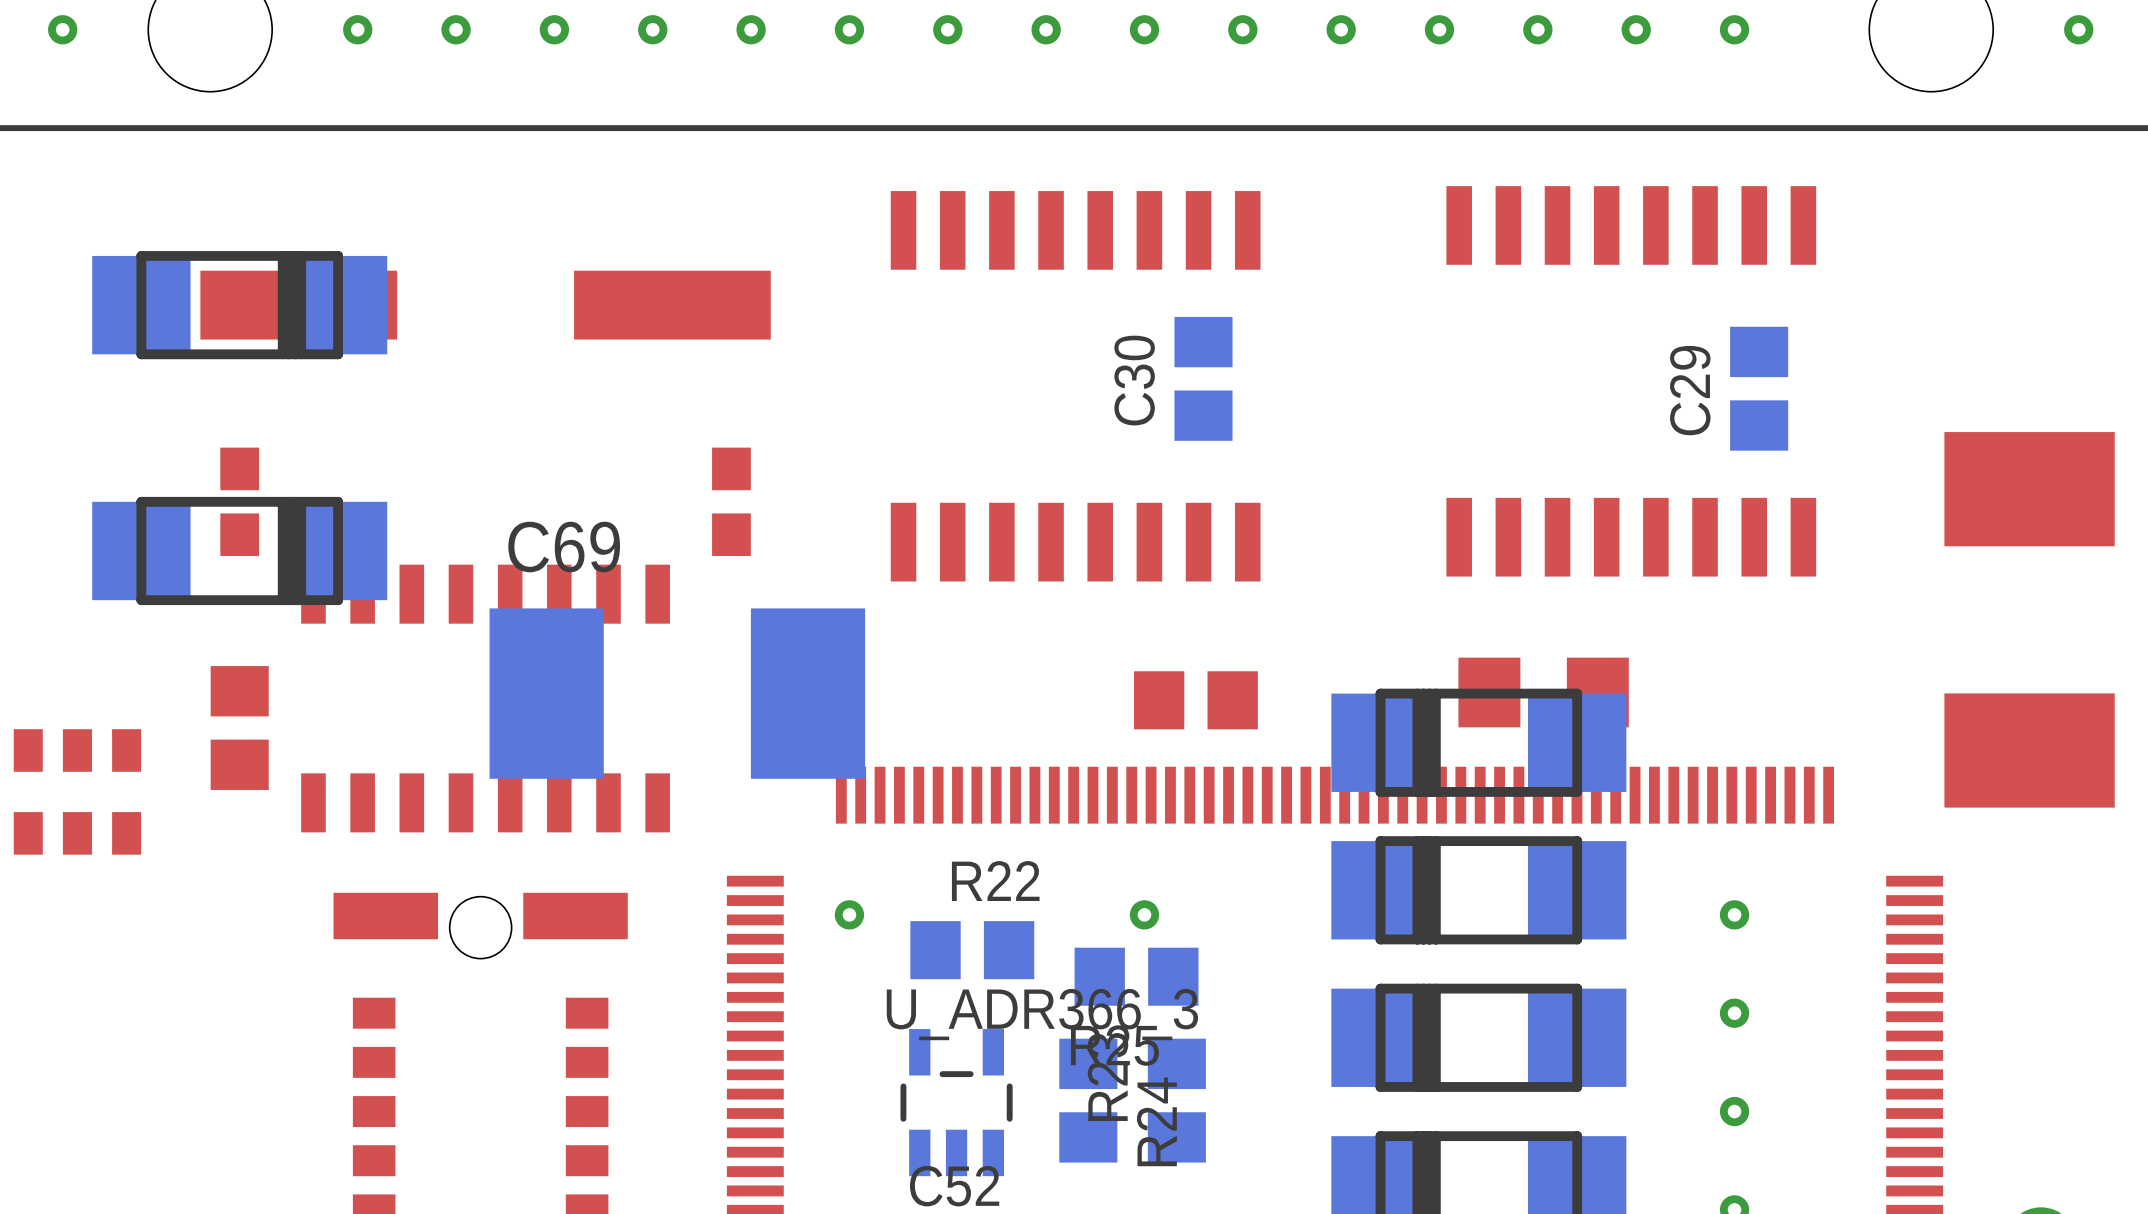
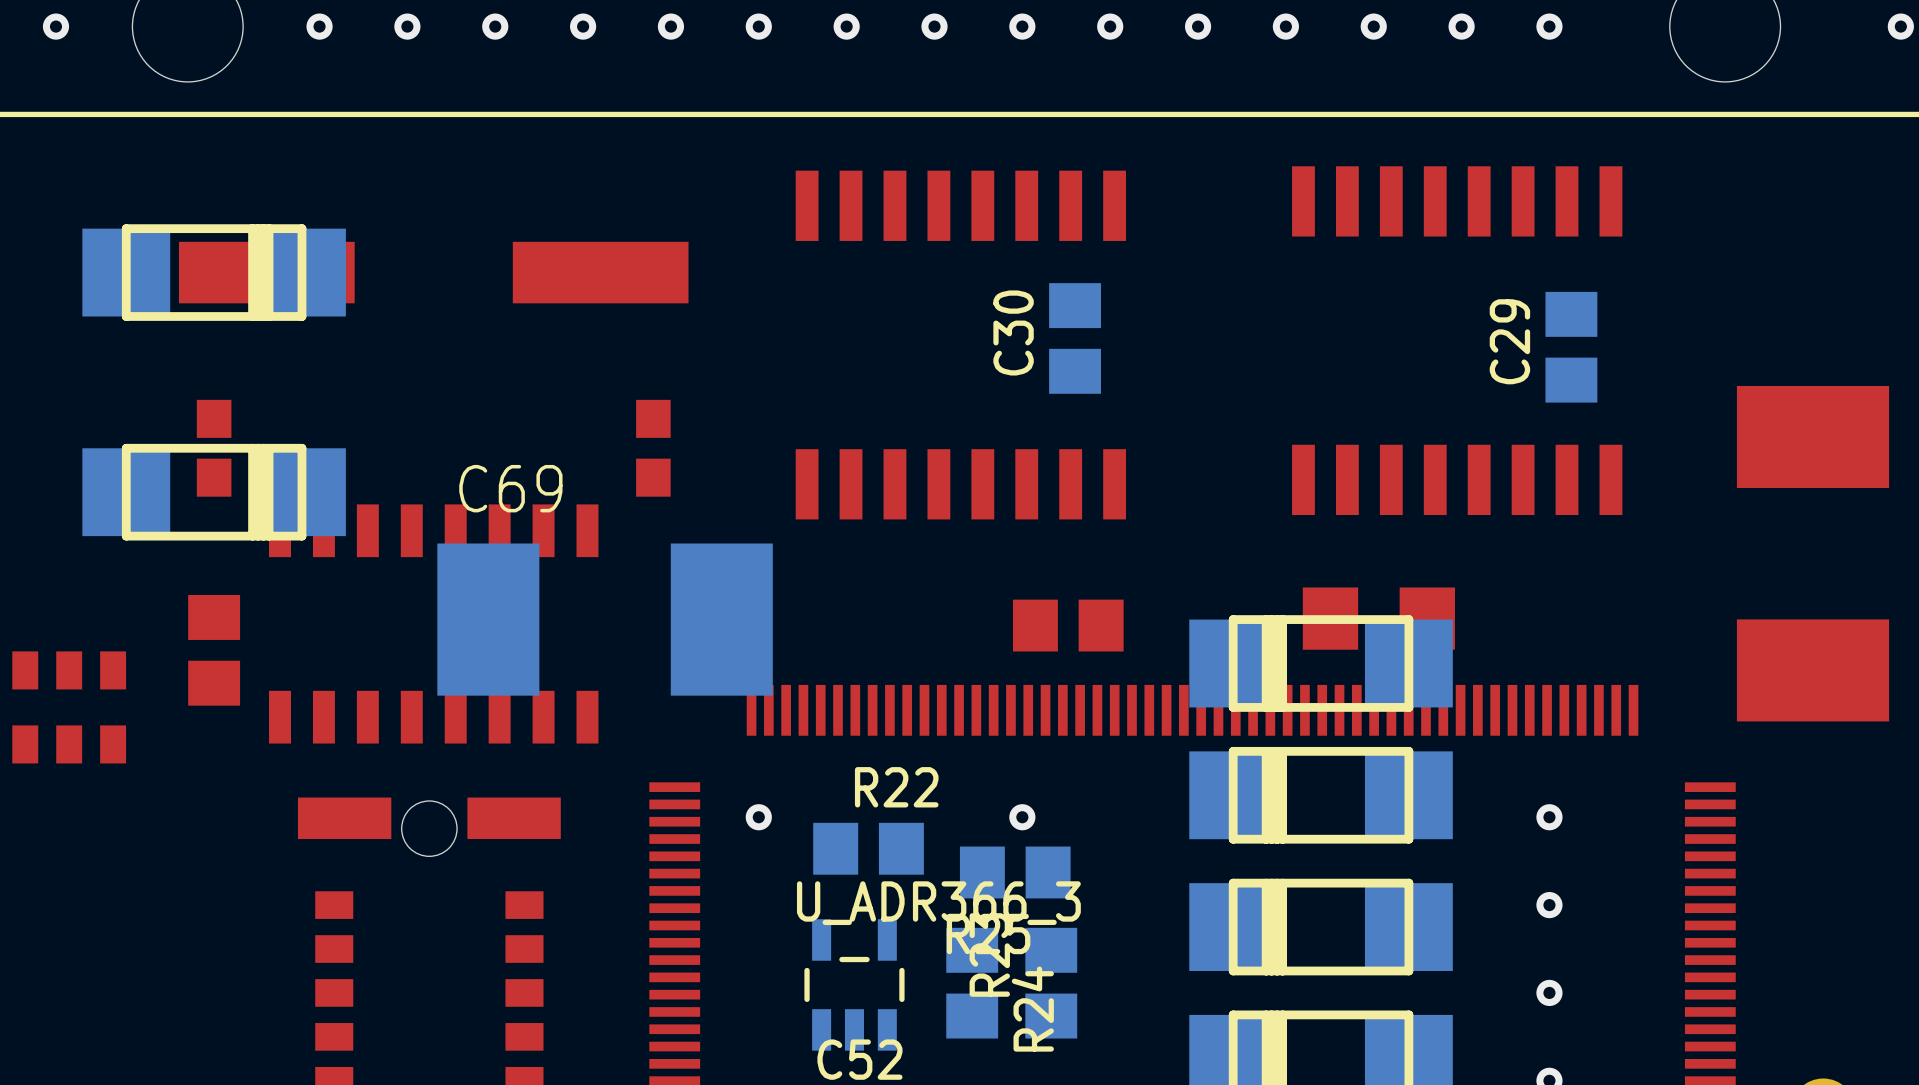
via: (2078, 29) -> none
via: none -> (1900, 26)

